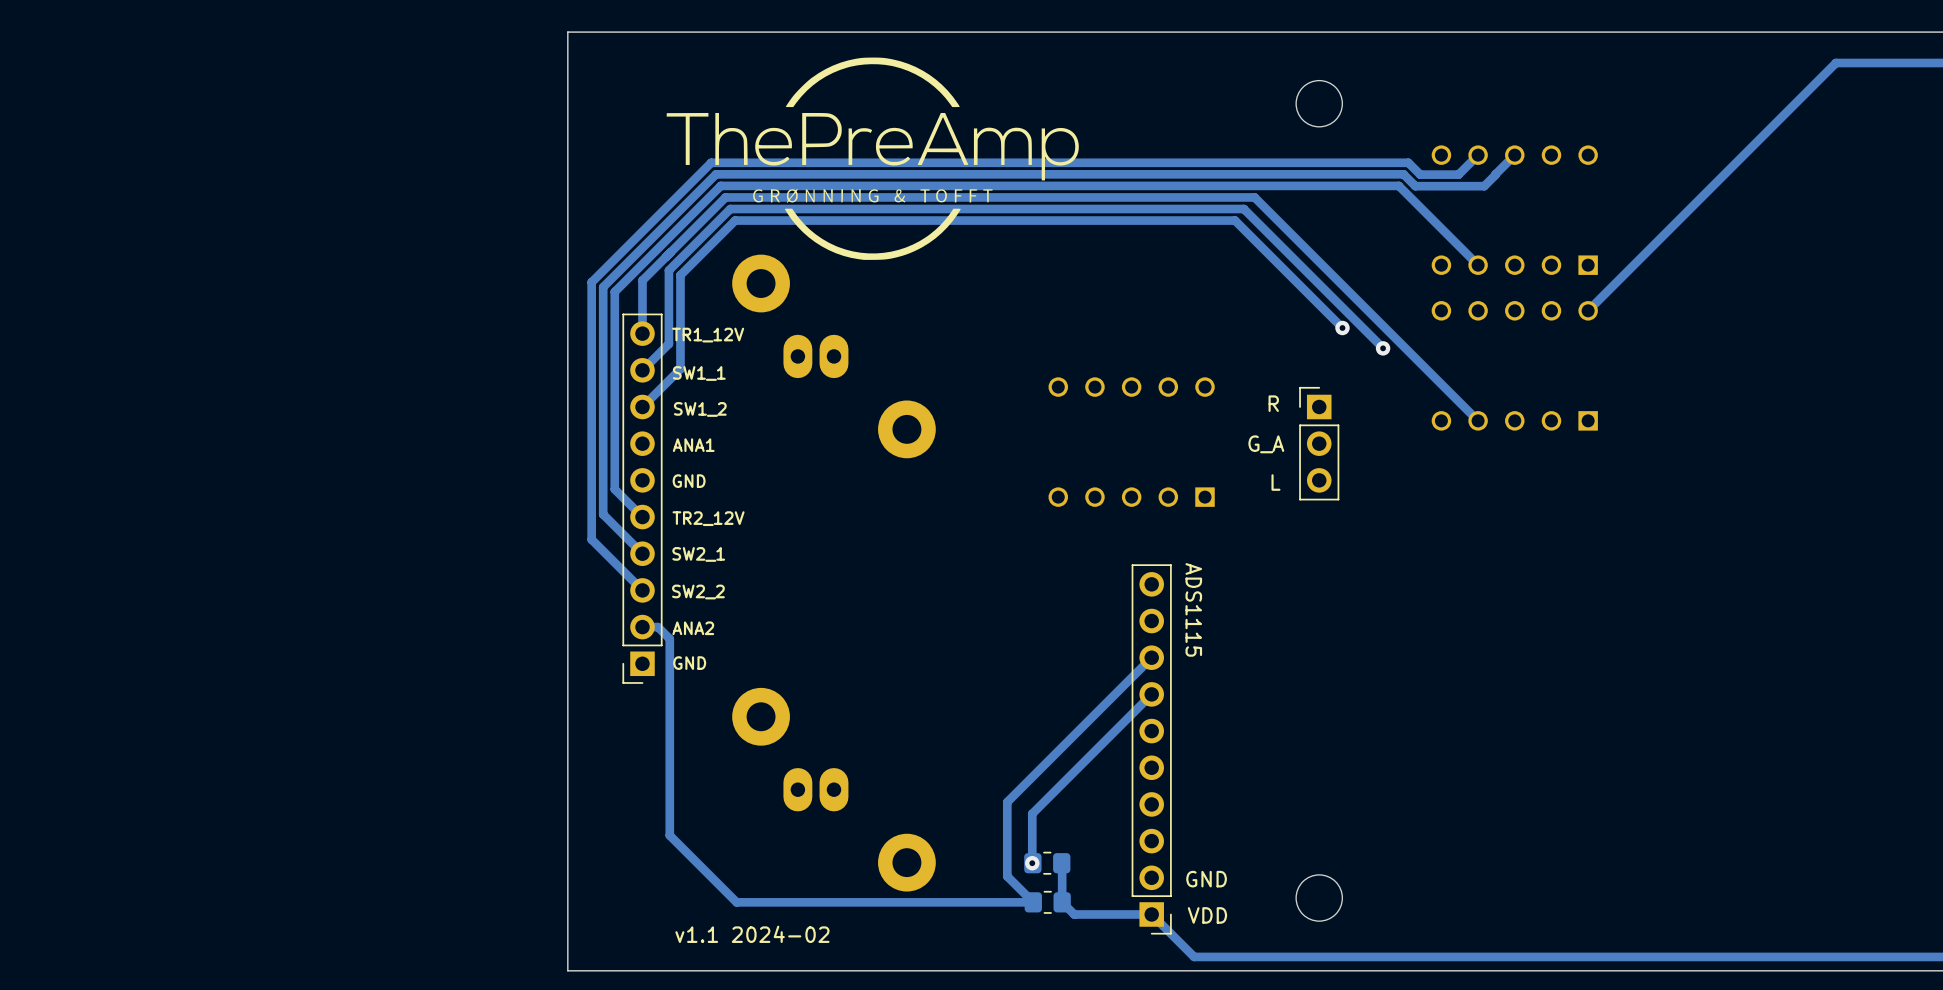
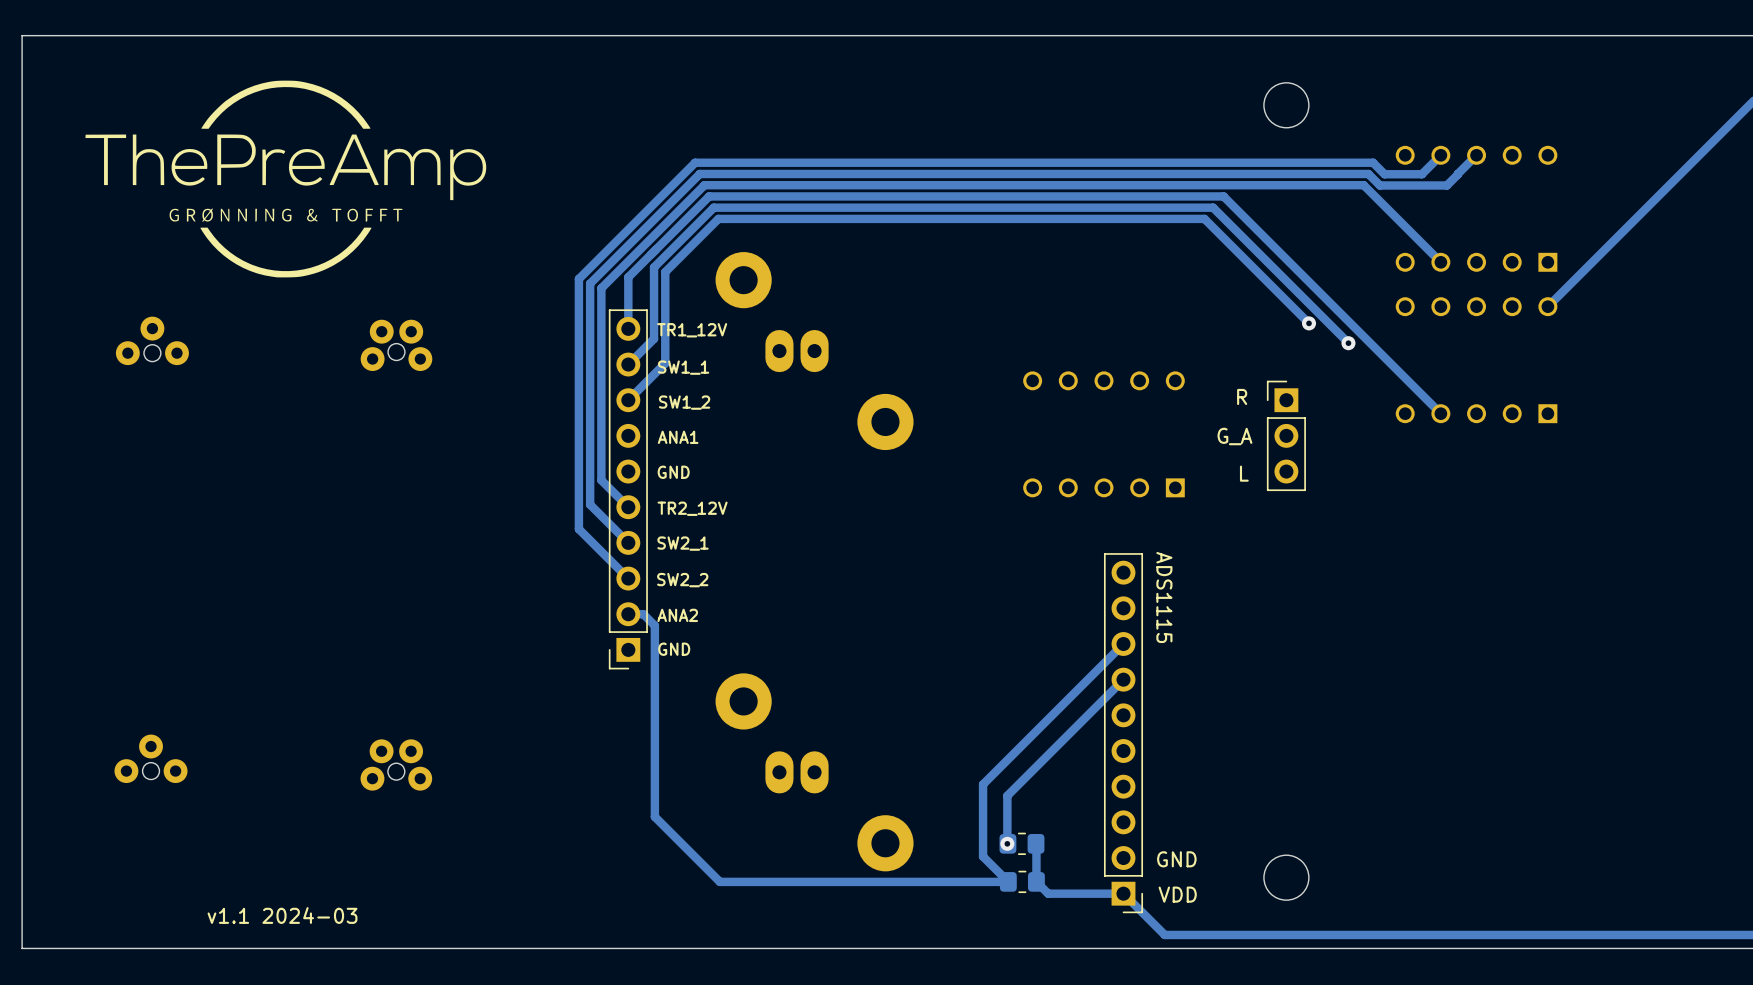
board edge: (567, 32) (567, 970) -> (555, 35) (22, 35) (22, 948) (555, 948)
drawing: [666, 57, 1079, 260] -> none
drawing: none -> [85, 80, 487, 278]
part: none -> (152, 340)
part: none -> (396, 345)
part: none -> (151, 758)
part: none -> (396, 764)
text: v1.1 2024-02 (752, 934) -> none
text: none -> v1.1 2024-03 (282, 915)

